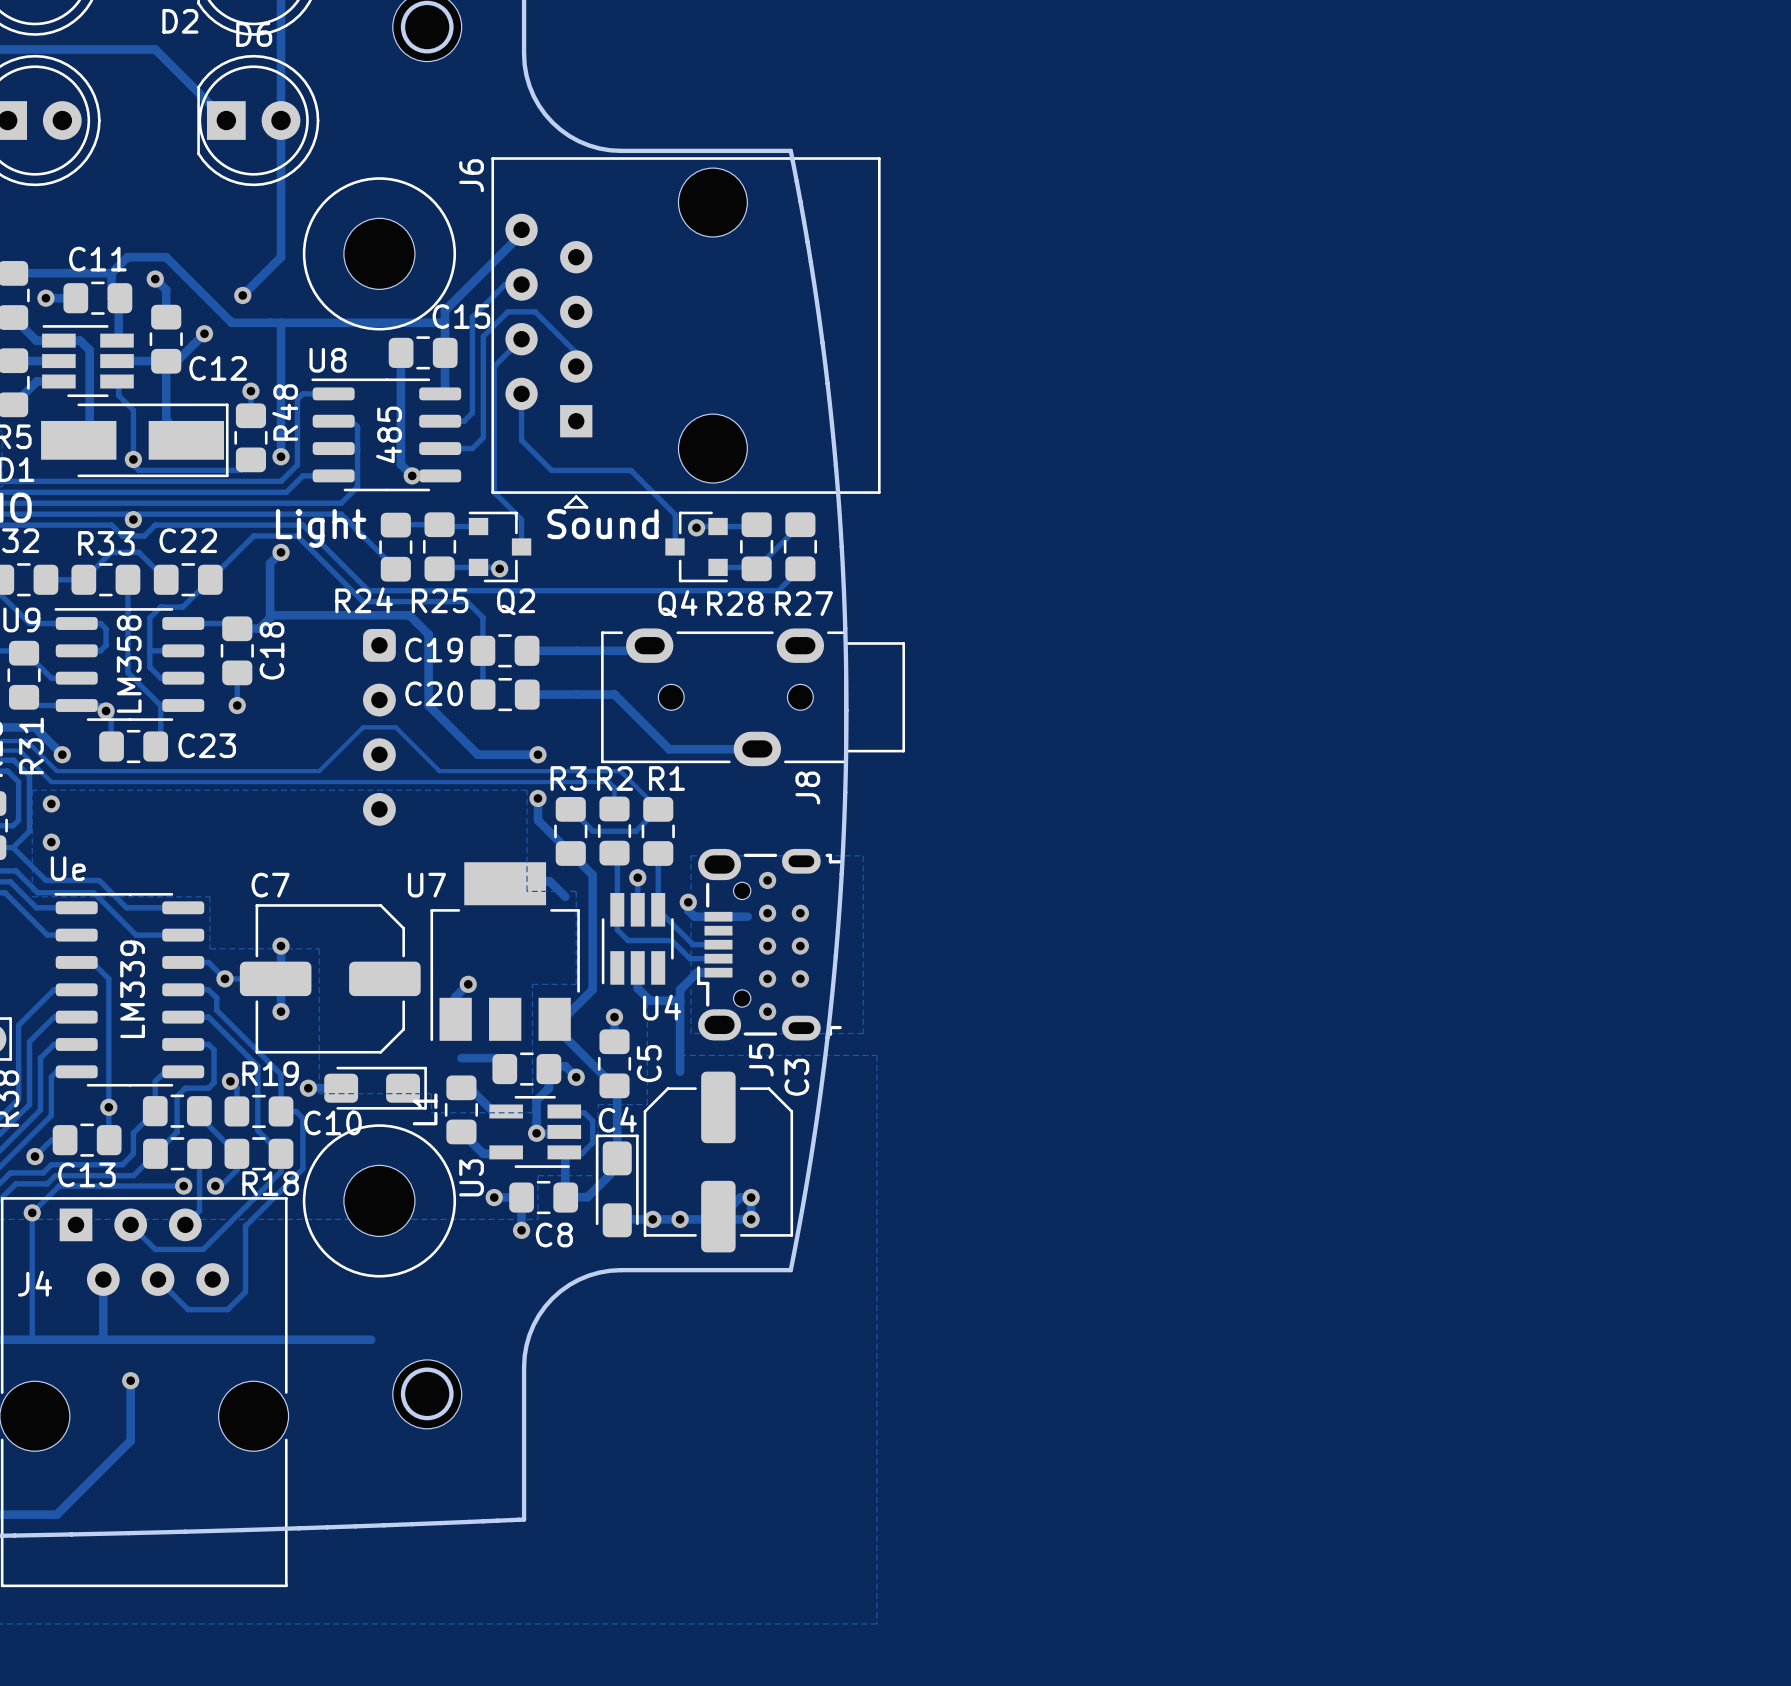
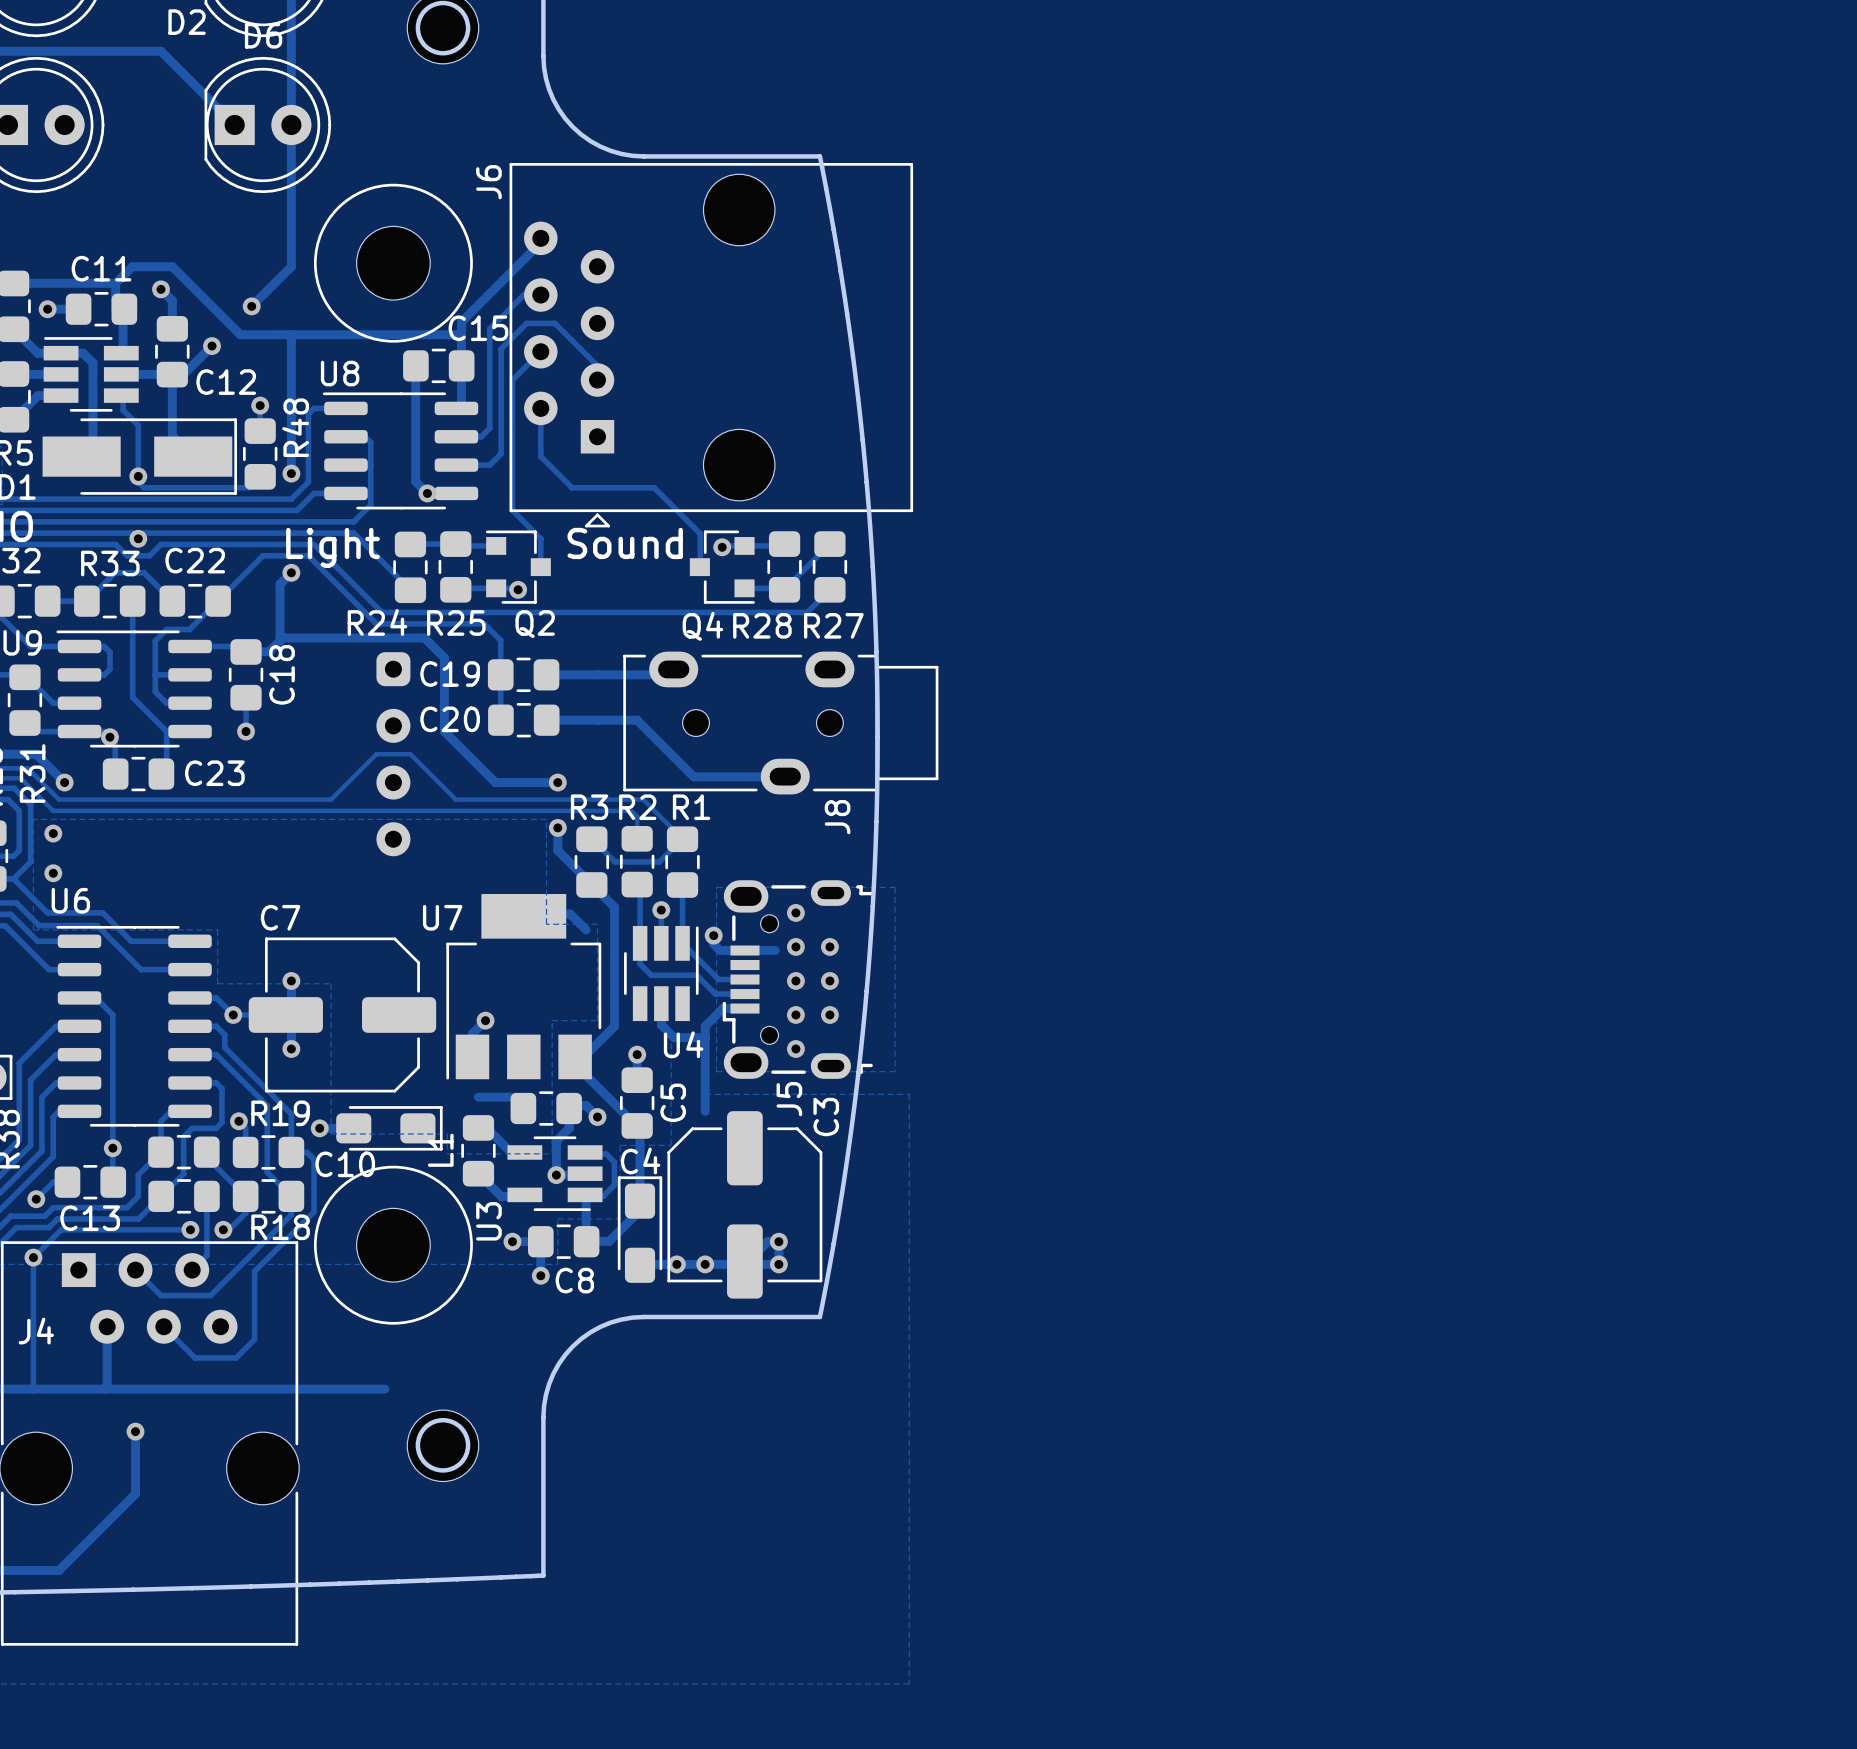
U8 value: 485 (389, 434) -> none
U9 value: LM358 (129, 663) -> none
Ue name: Ue (68, 868) -> U6 (70, 900)
U4 rotation: 0° (637, 938) -> 180° (661, 973)
Ue value: LM339 (132, 989) -> none

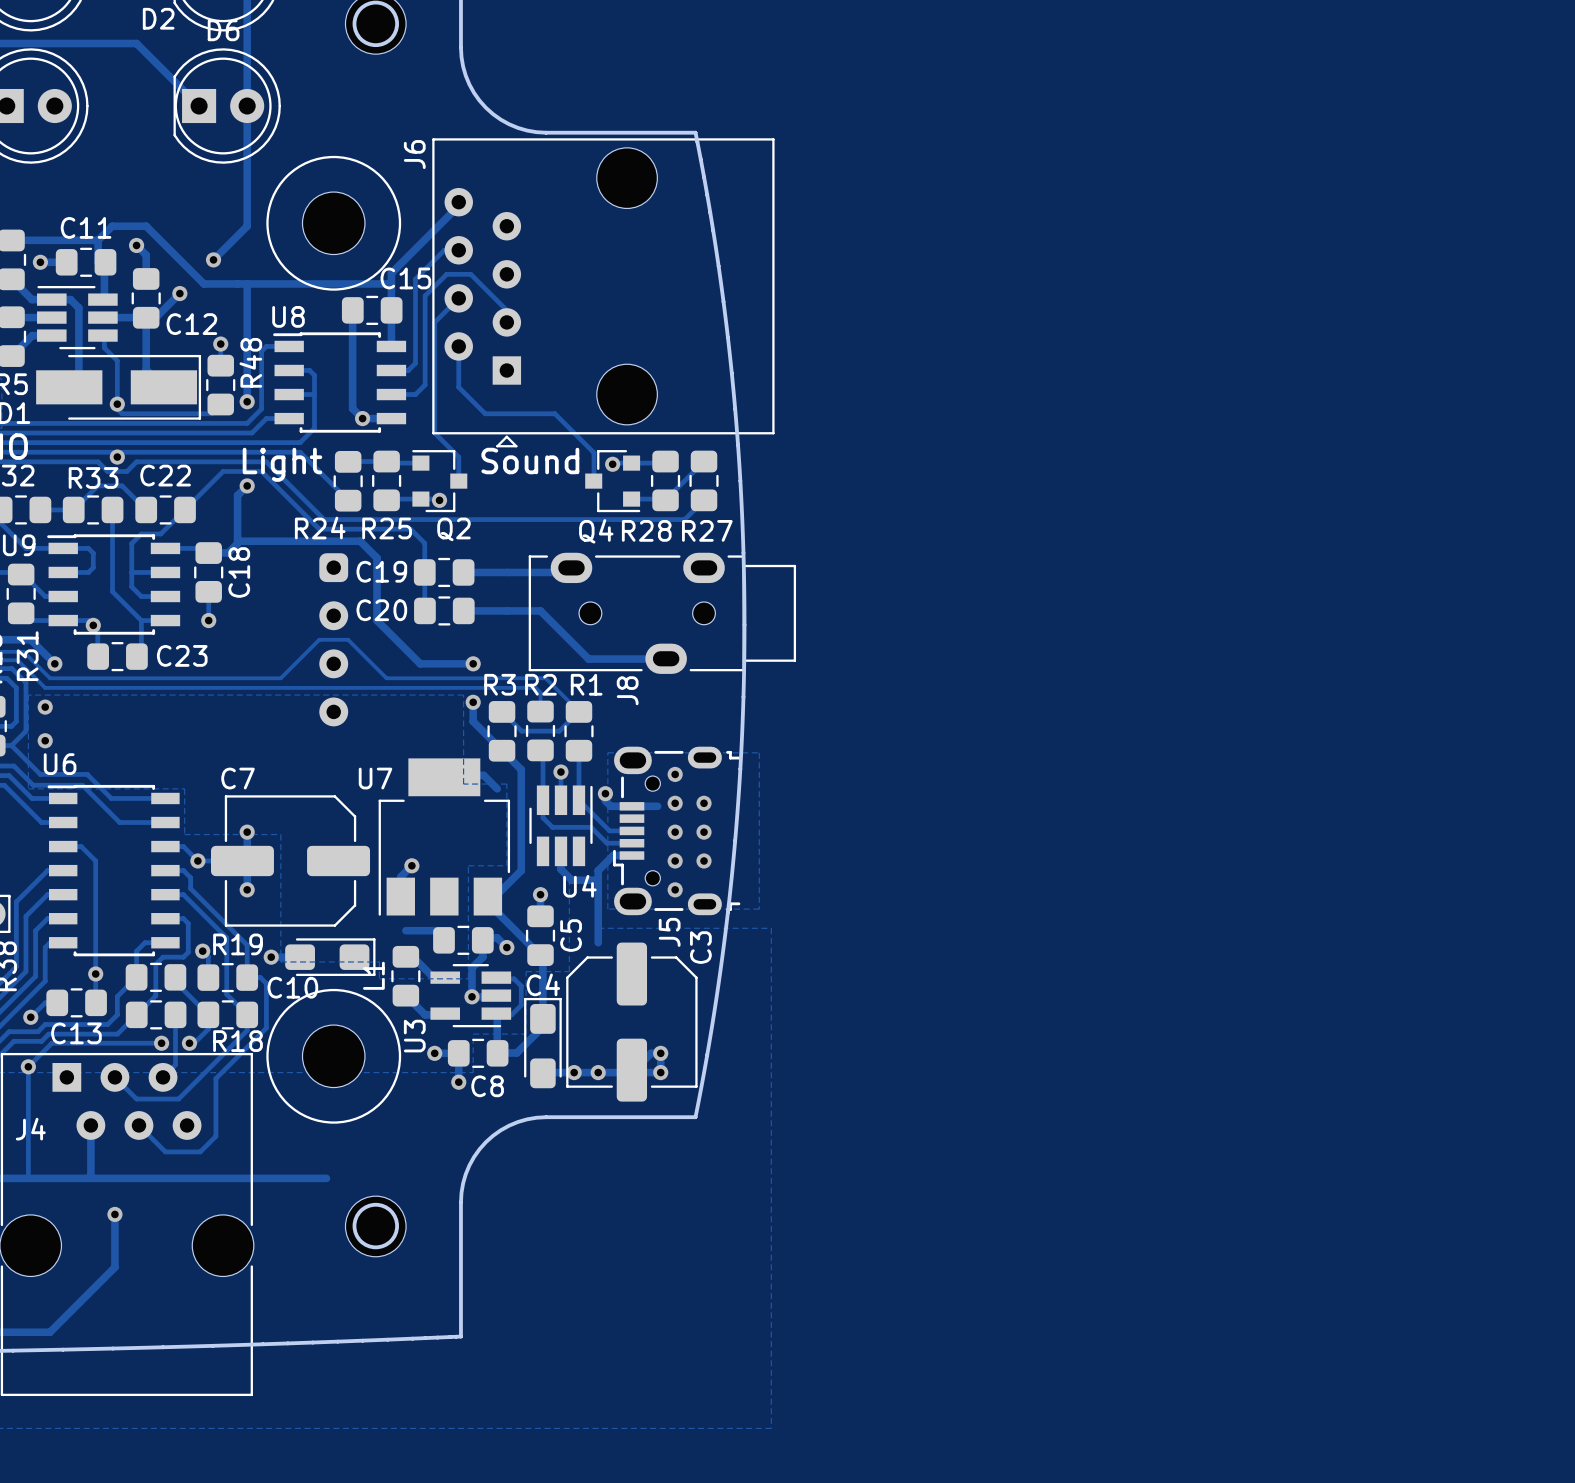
U8 footprint: [322, 392, 479, 510] -> [273, 332, 407, 433]
U9 footprint: [56, 630, 212, 748] -> [47, 534, 181, 635]
J8 name position: J8 (837, 817) -> J8 (627, 690)
U6 footprint: [56, 925, 212, 1127] -> [47, 784, 180, 957]

